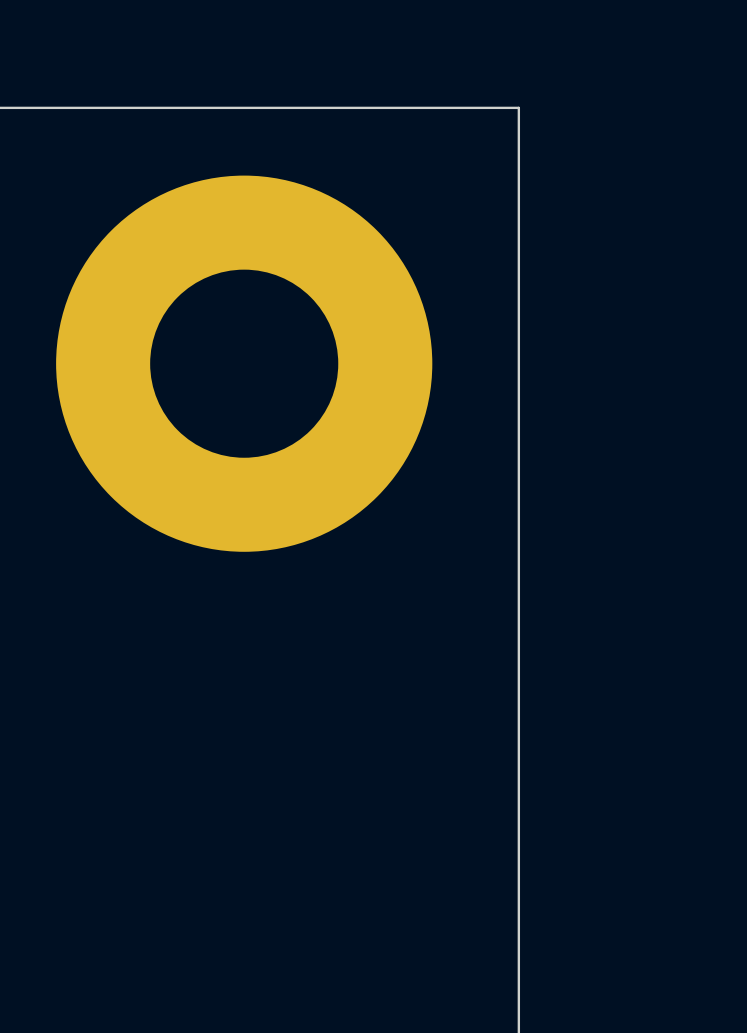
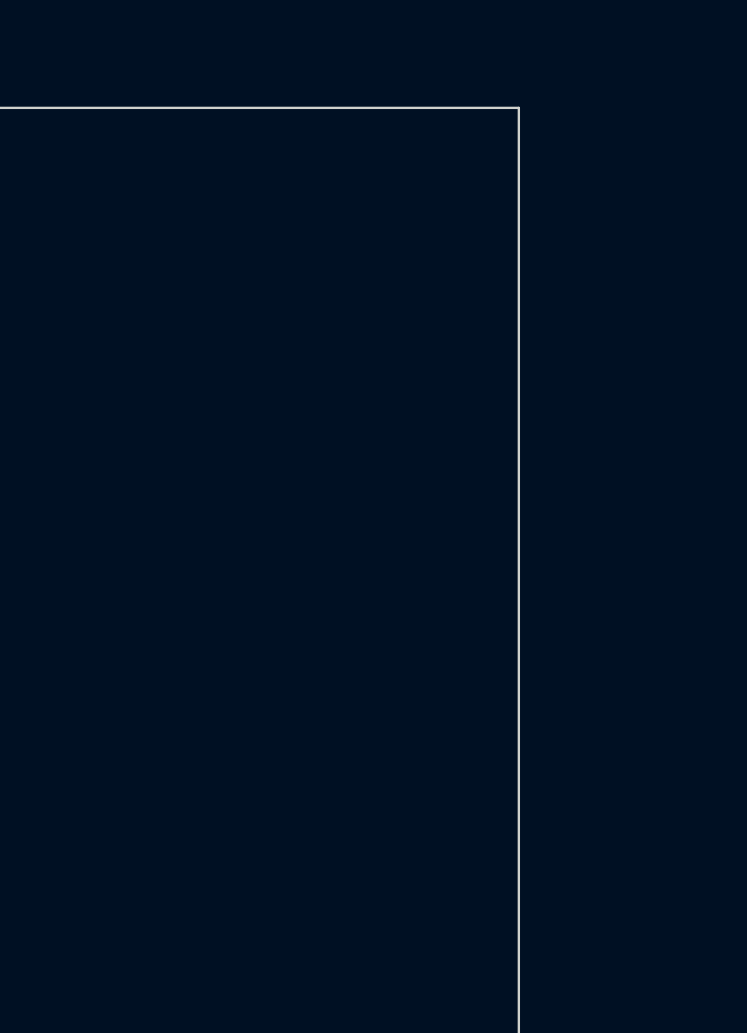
part: (244, 363) -> none

